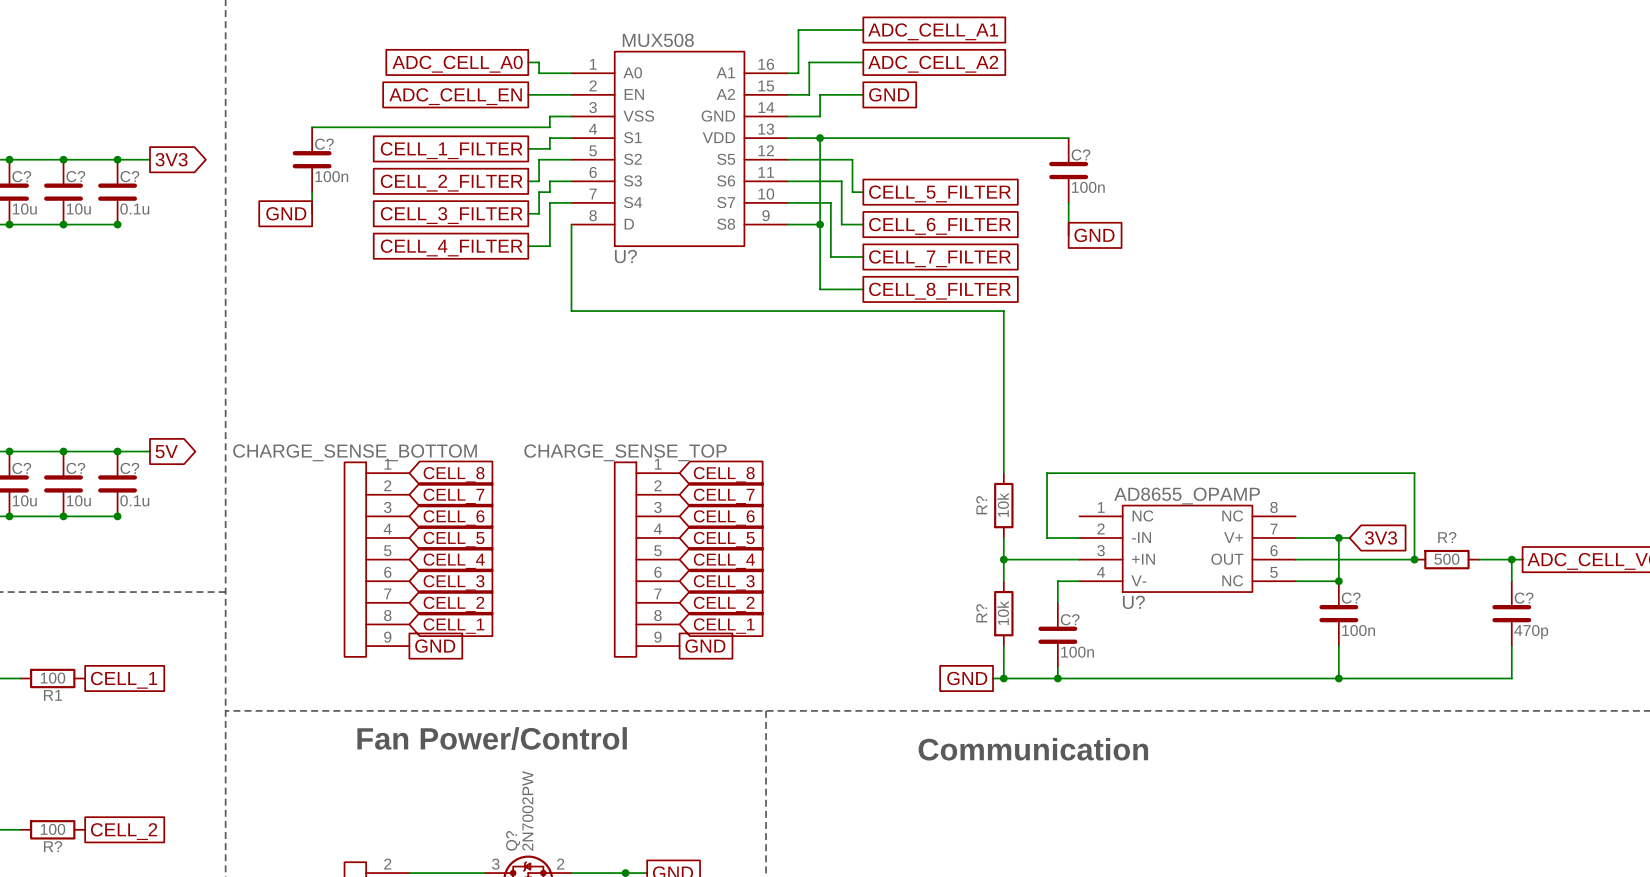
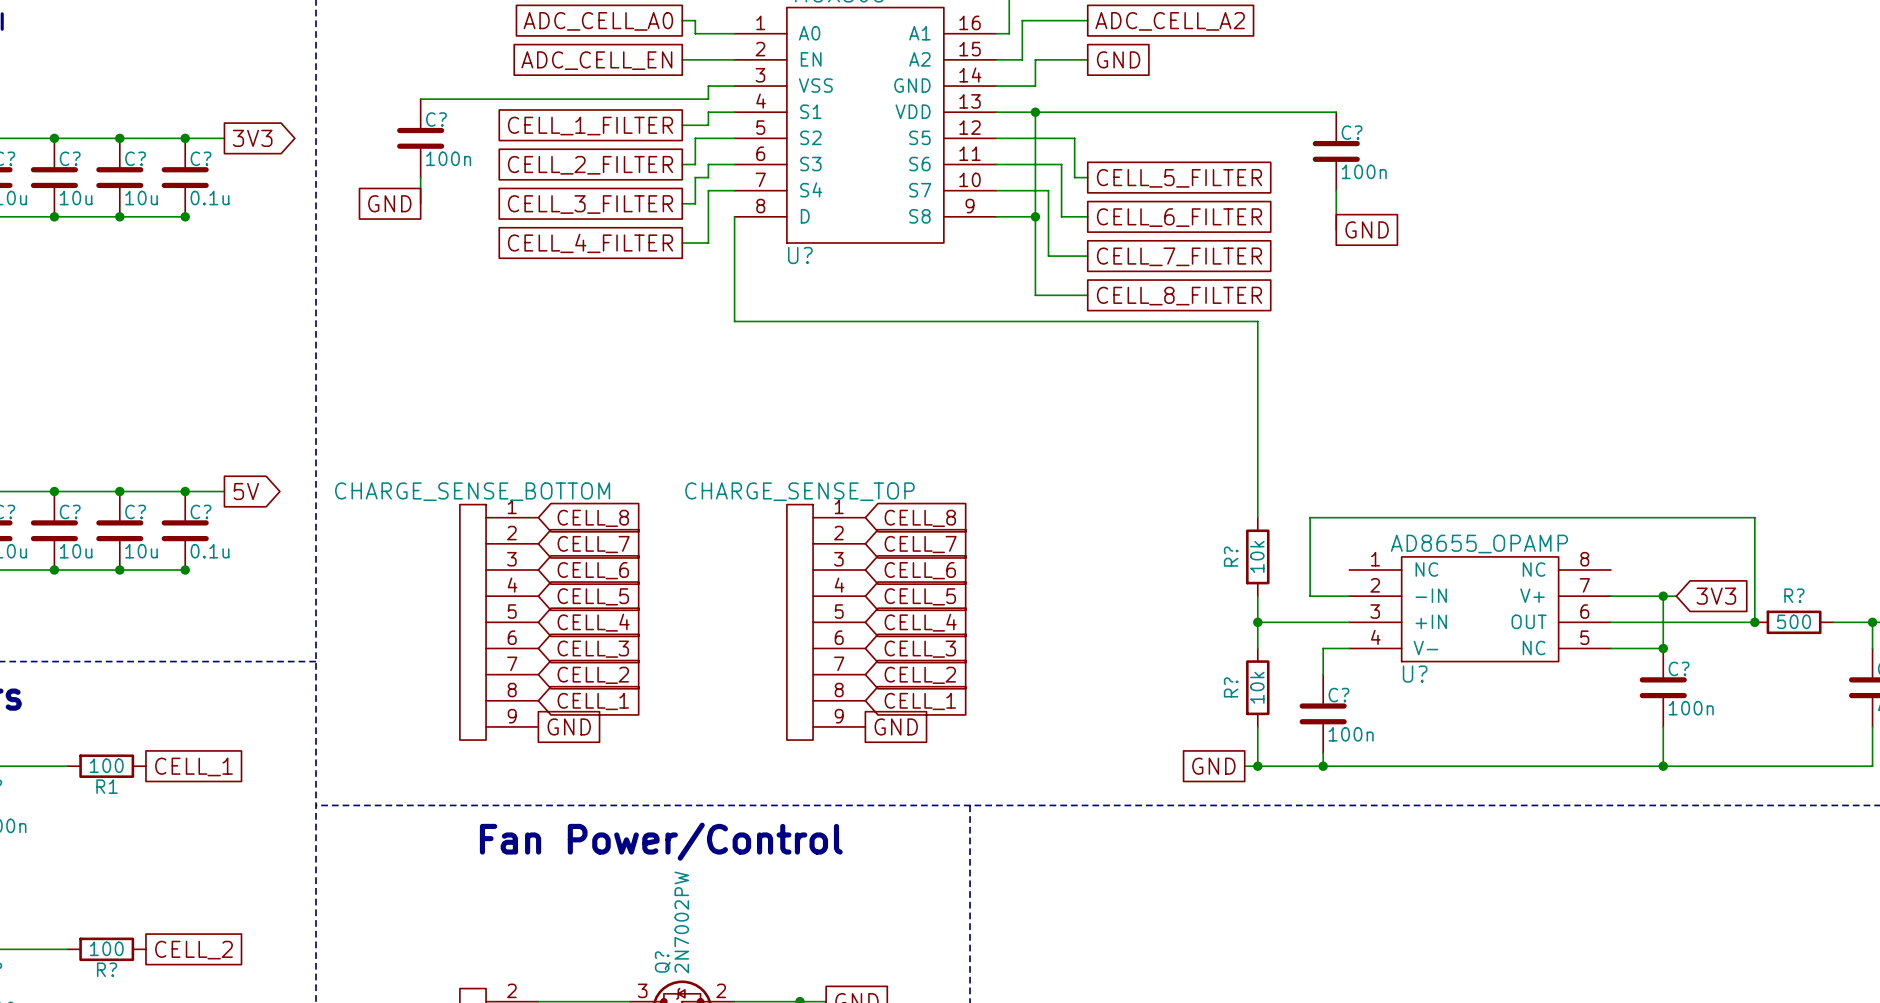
text: Communication (1033, 749) -> none

